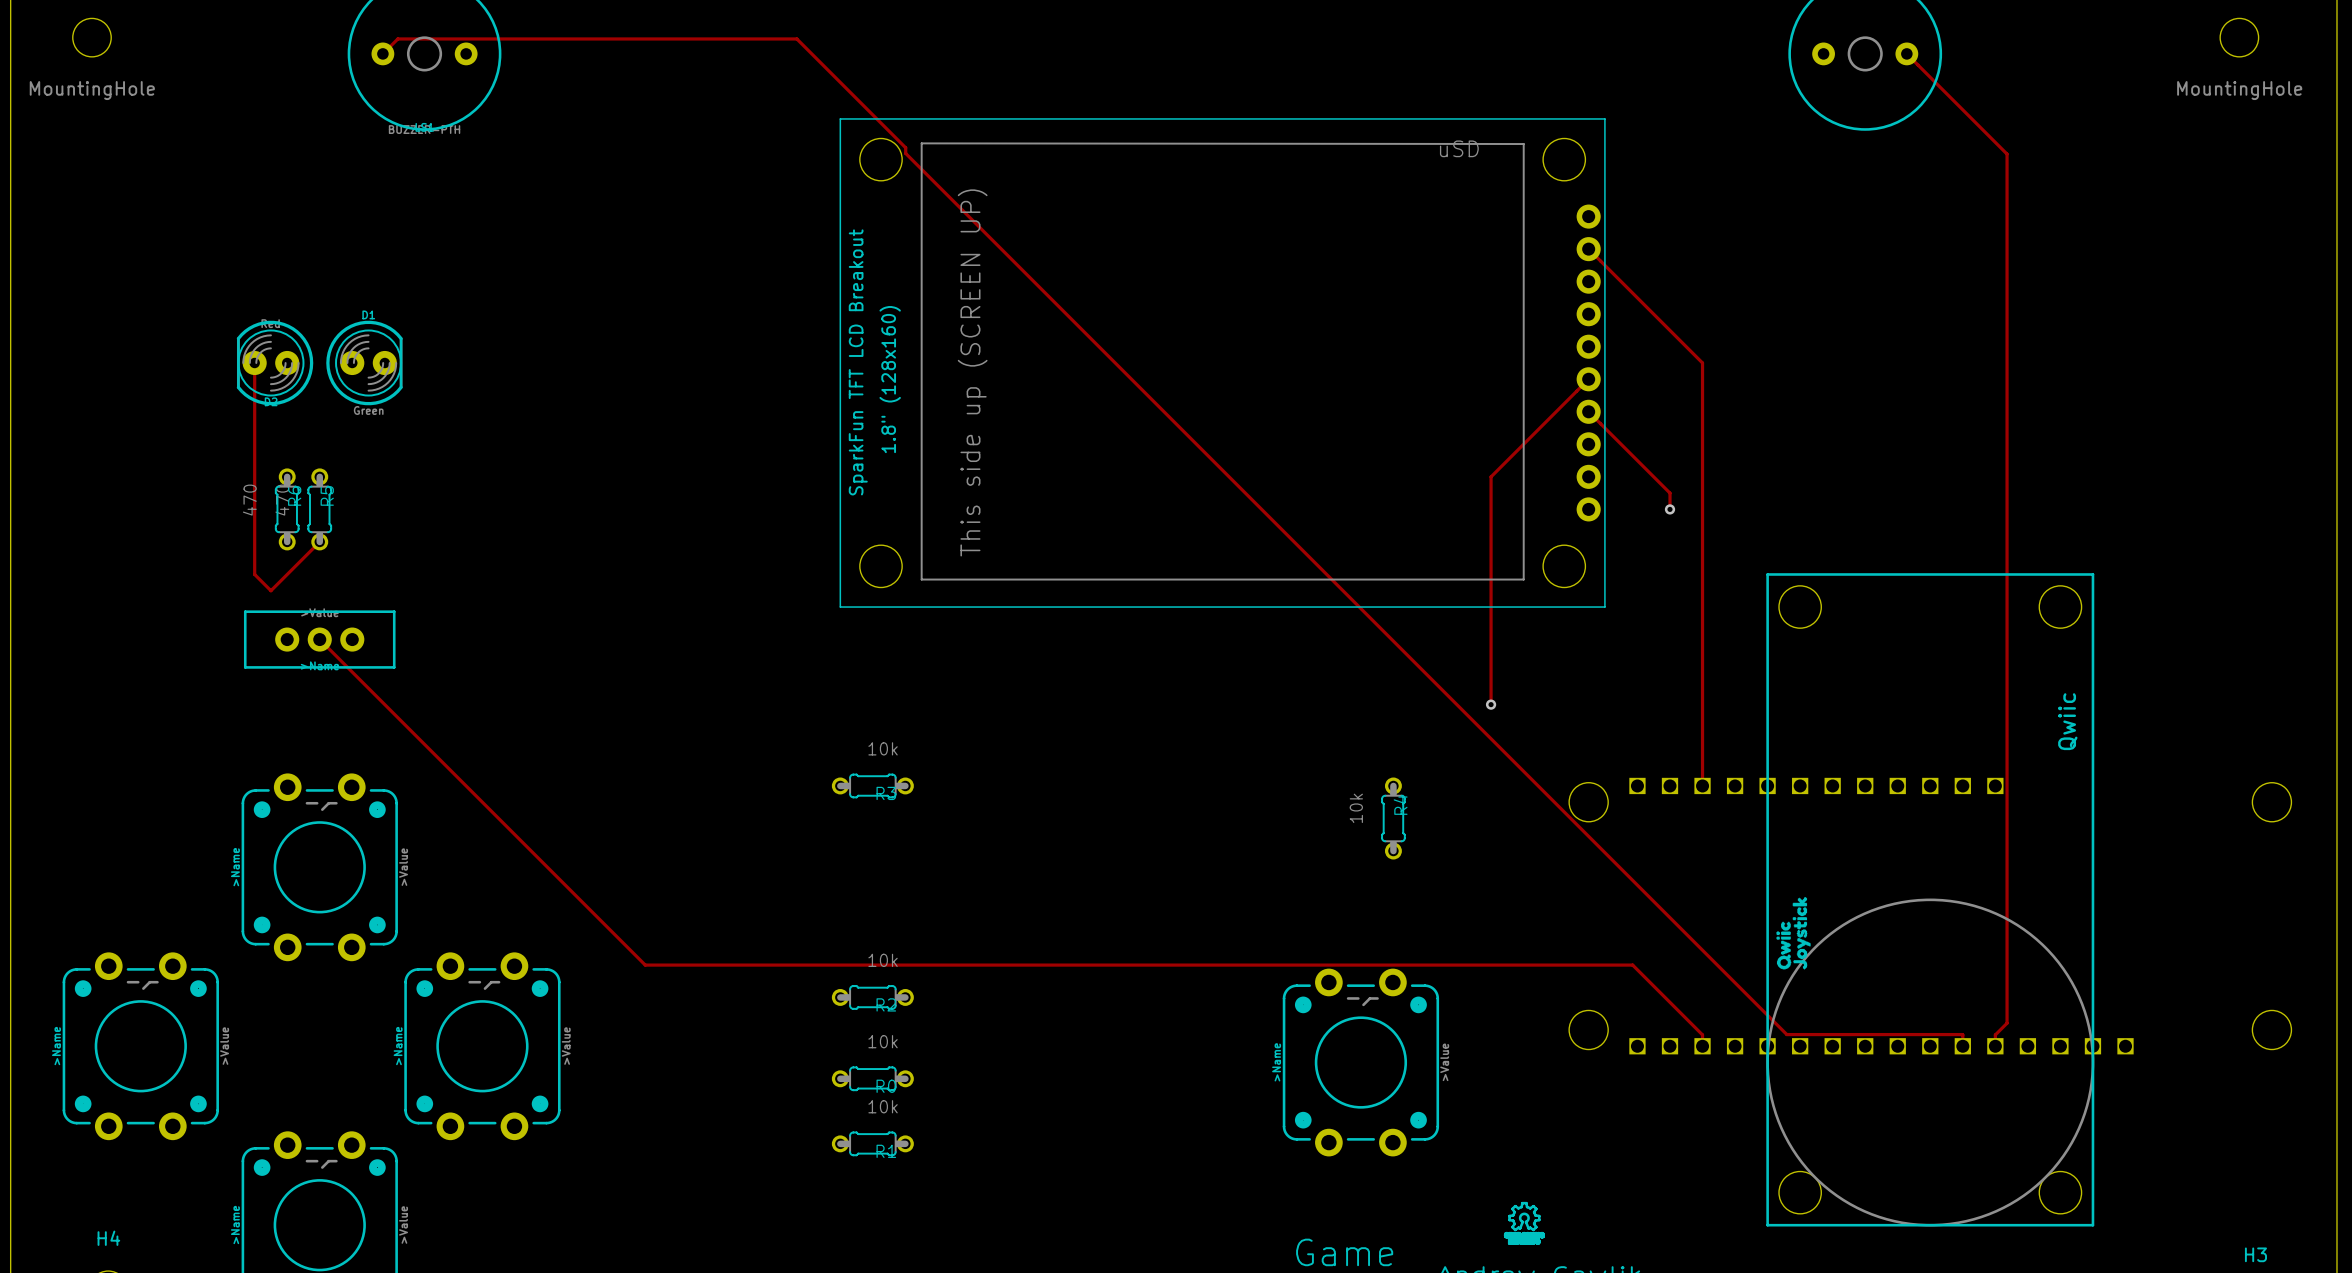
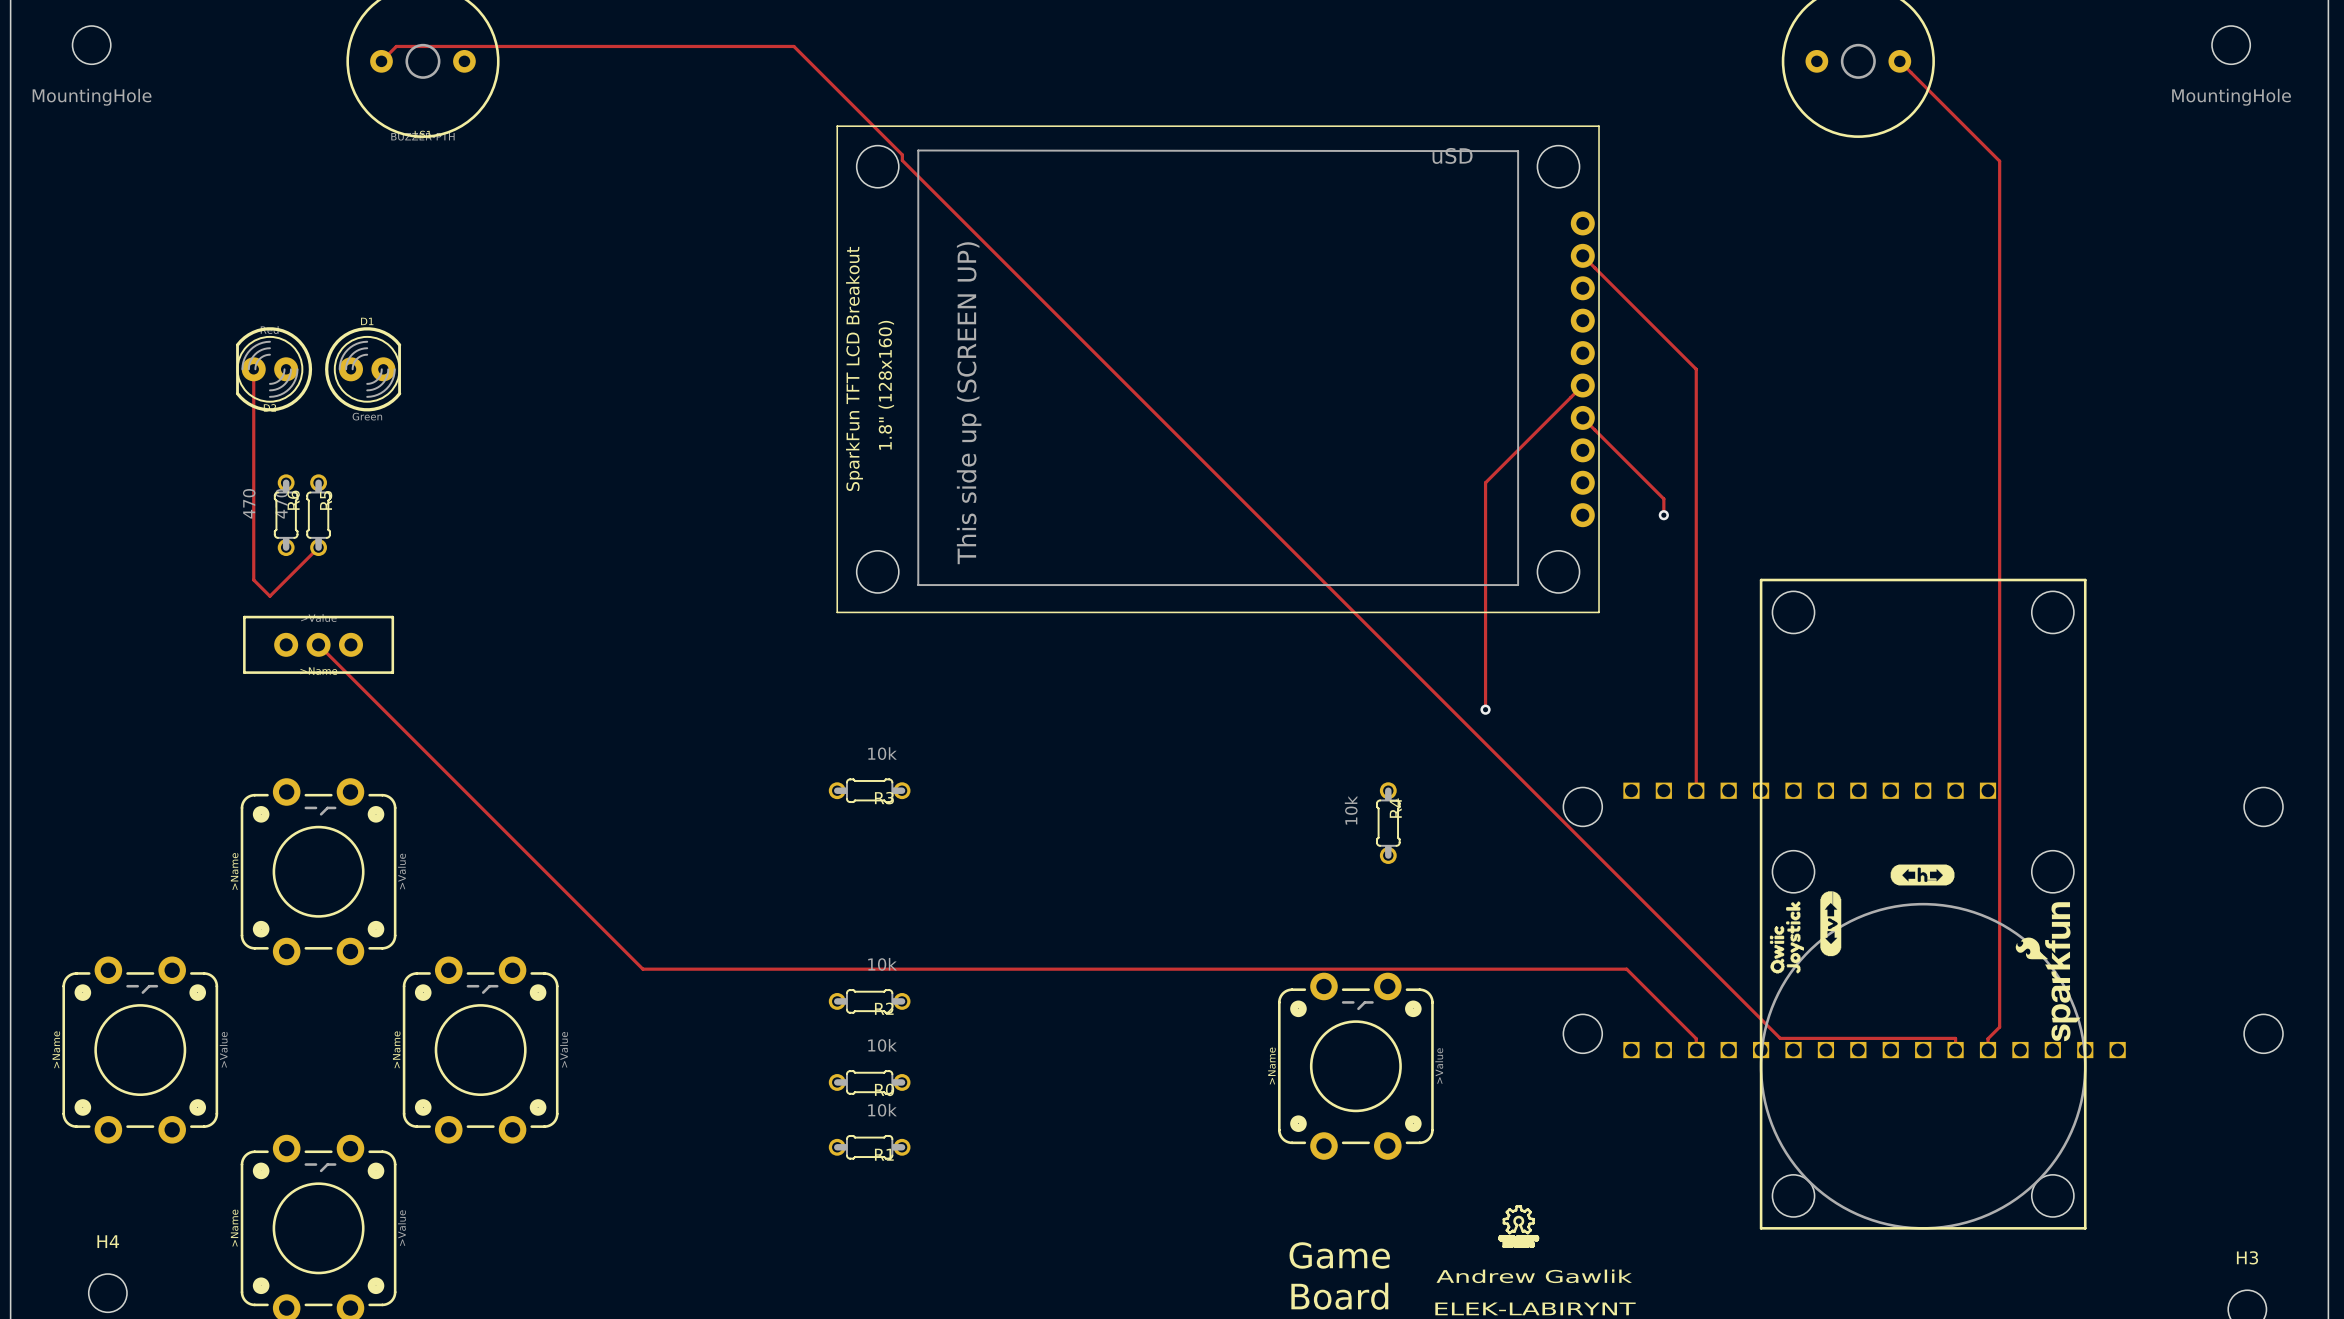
part footprint: [1766, 573, 2095, 1227] -> [1759, 578, 2087, 1230]

